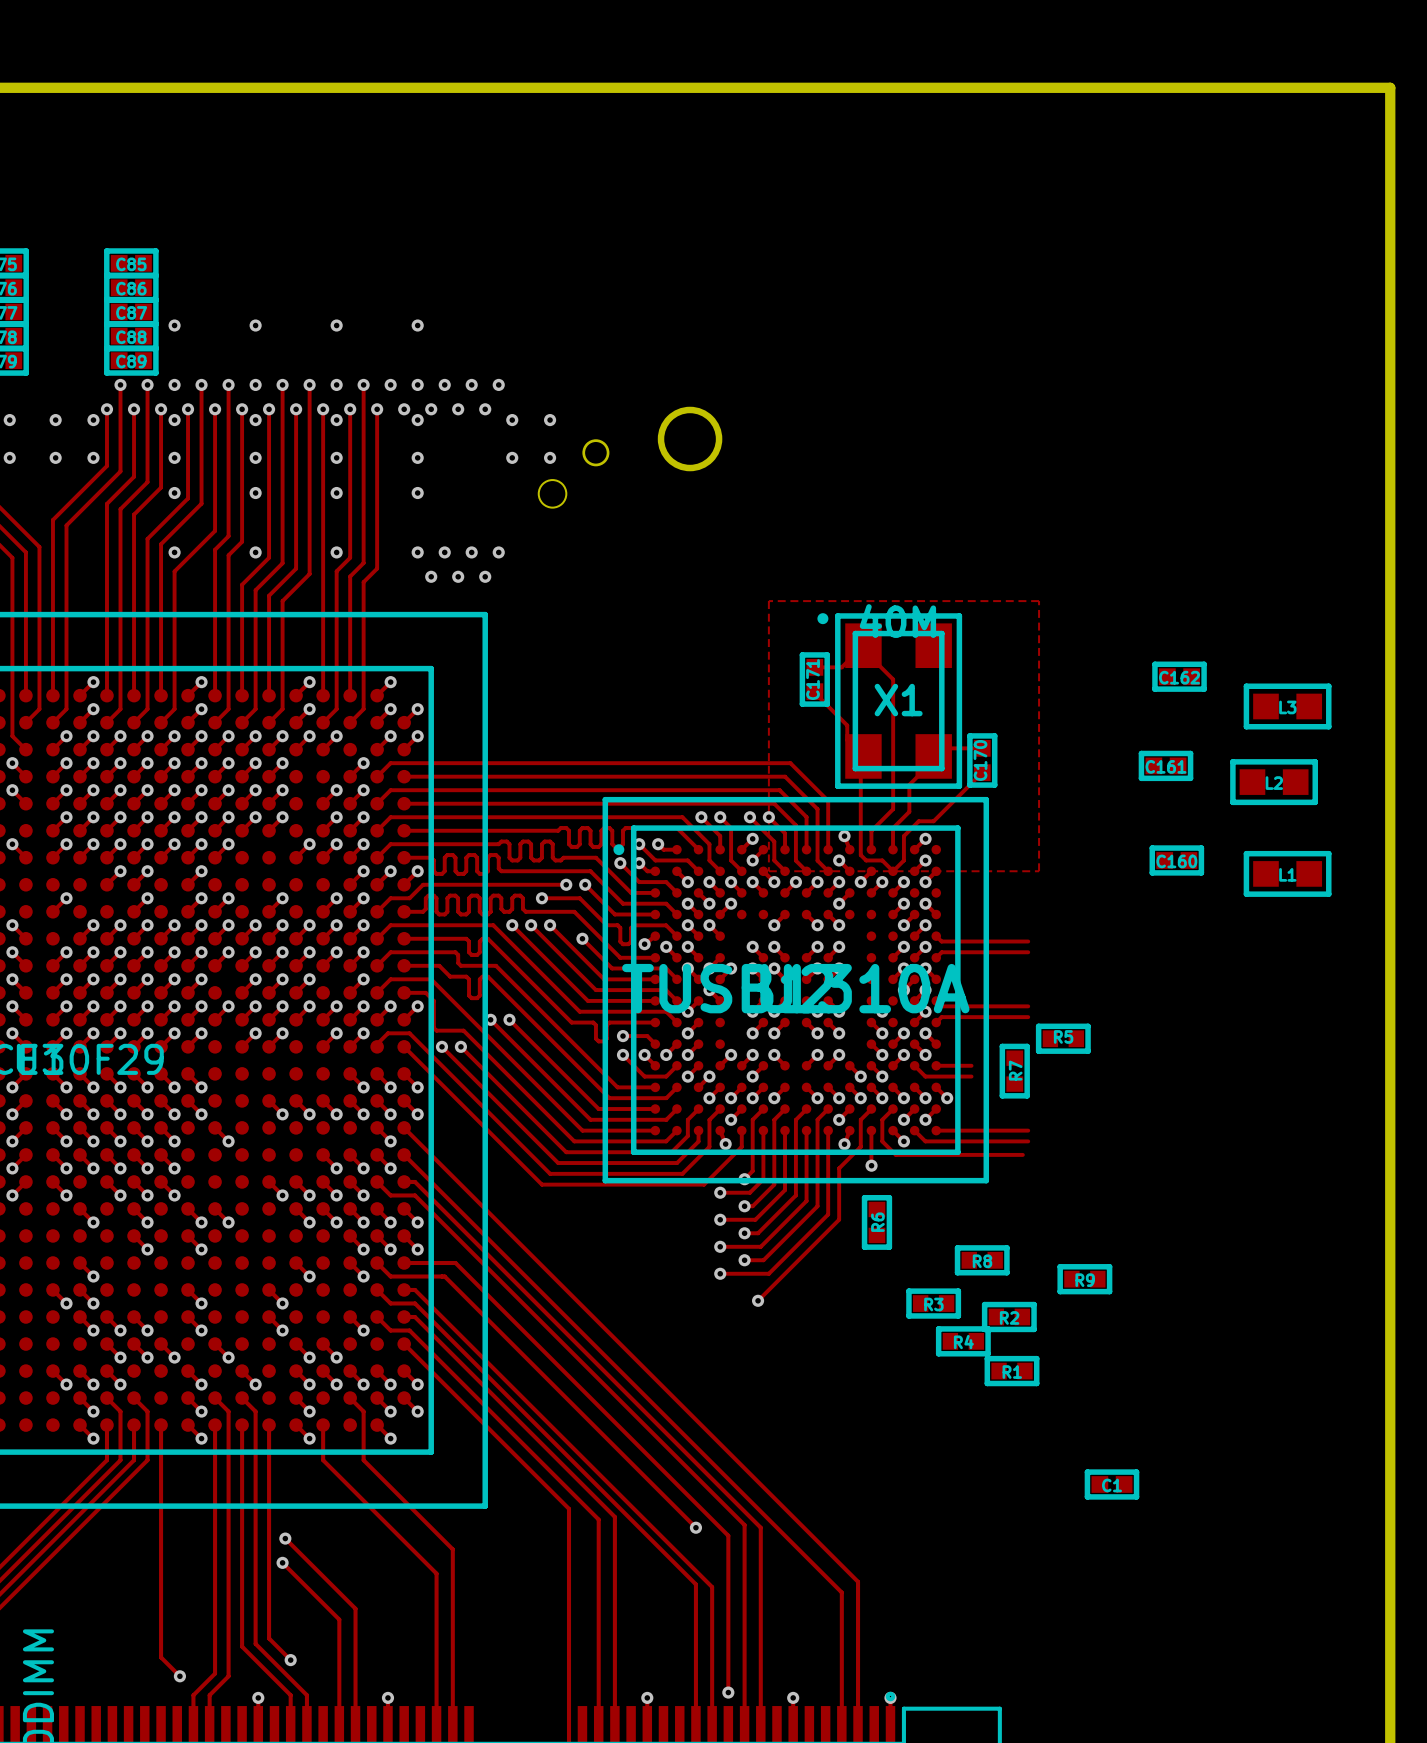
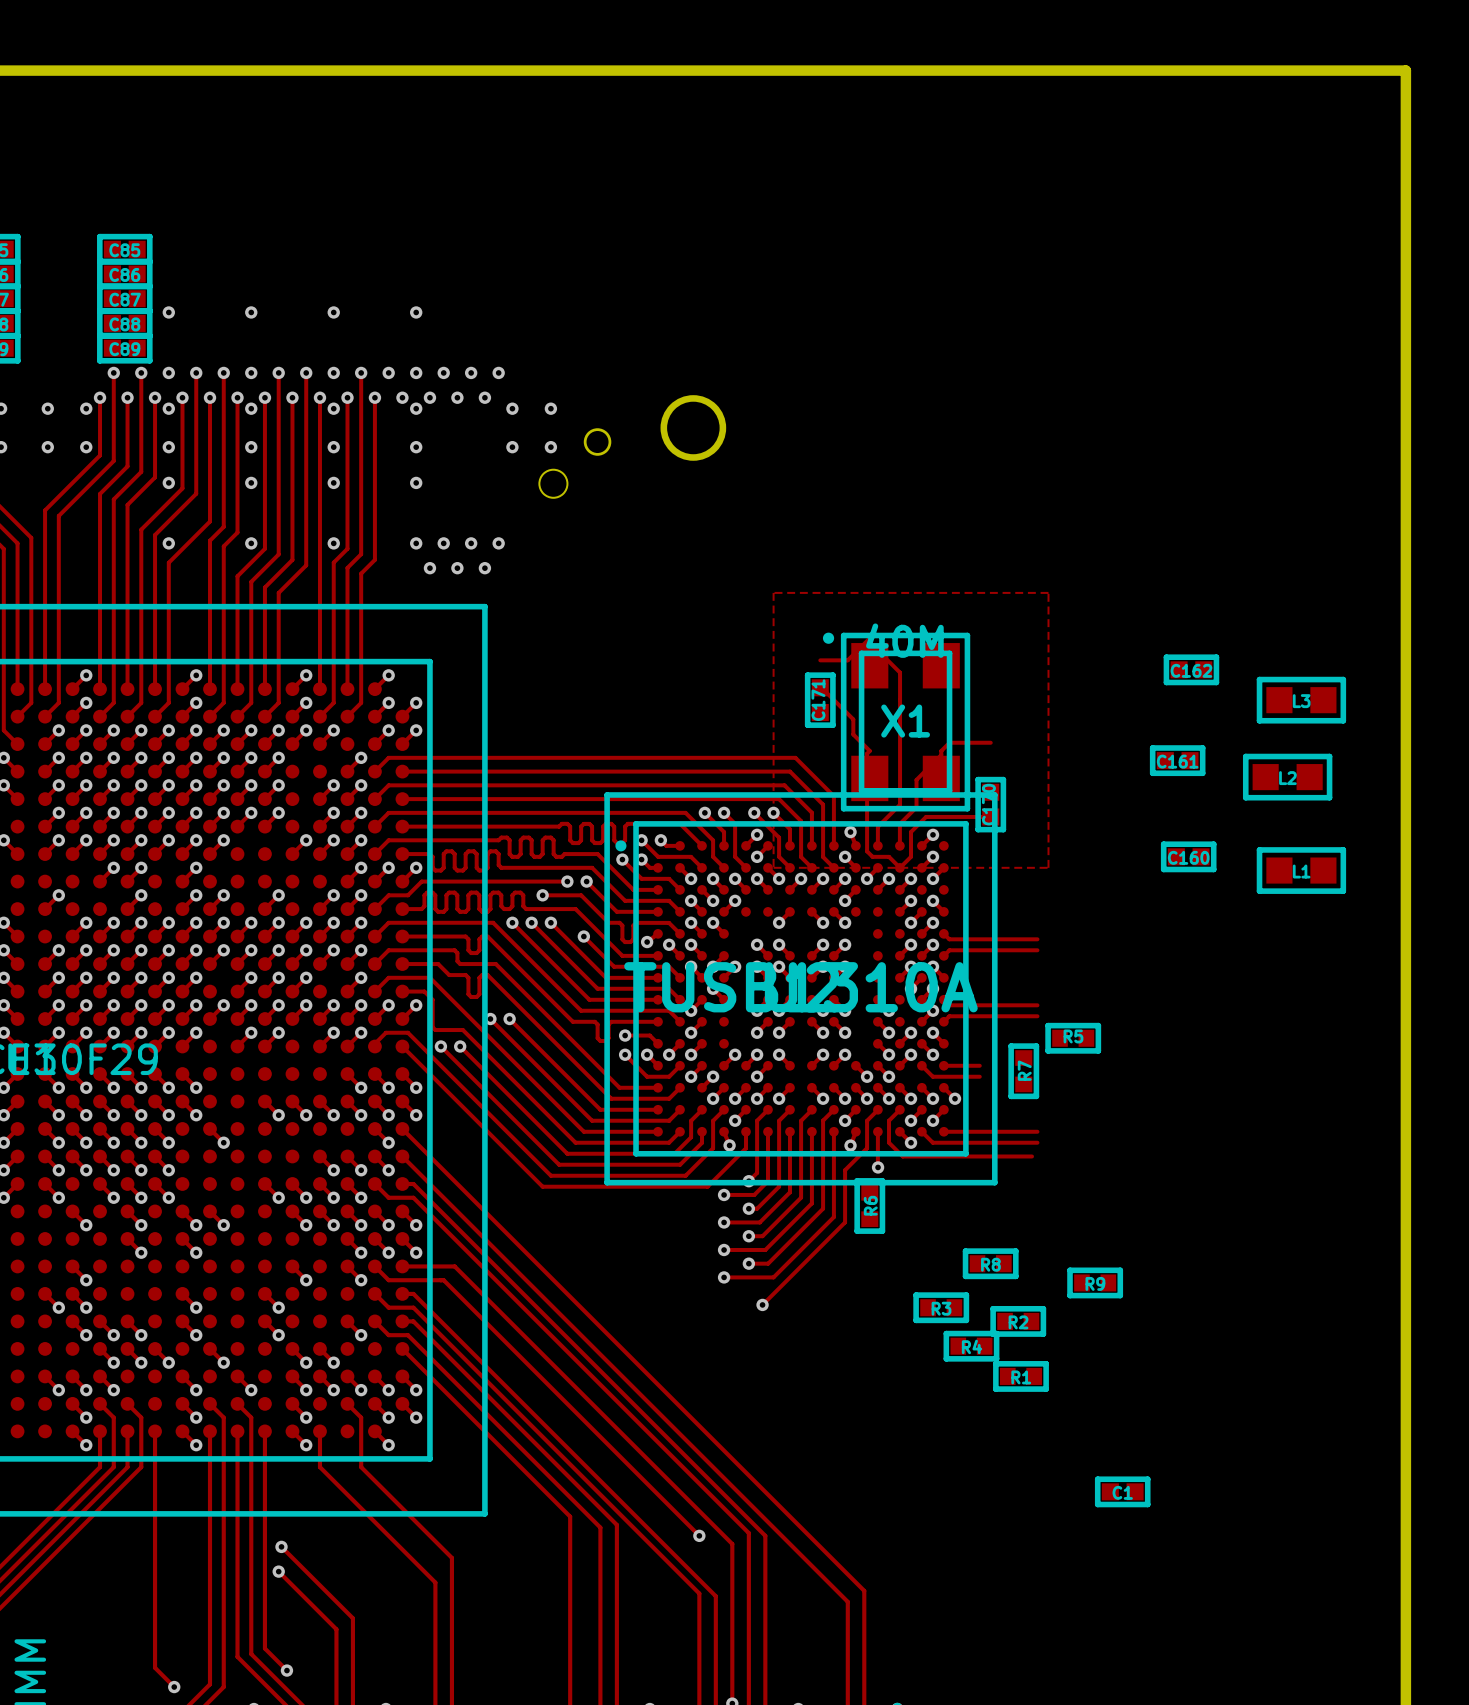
C171 position: (814, 679) -> (820, 700)
X1 position: (889, 701) -> (896, 722)
C170 position: (982, 760) -> (990, 804)
track: (982, 772) (933, 821) -> (990, 816) (941, 816)
R6 position: (876, 1222) -> (869, 1205)

